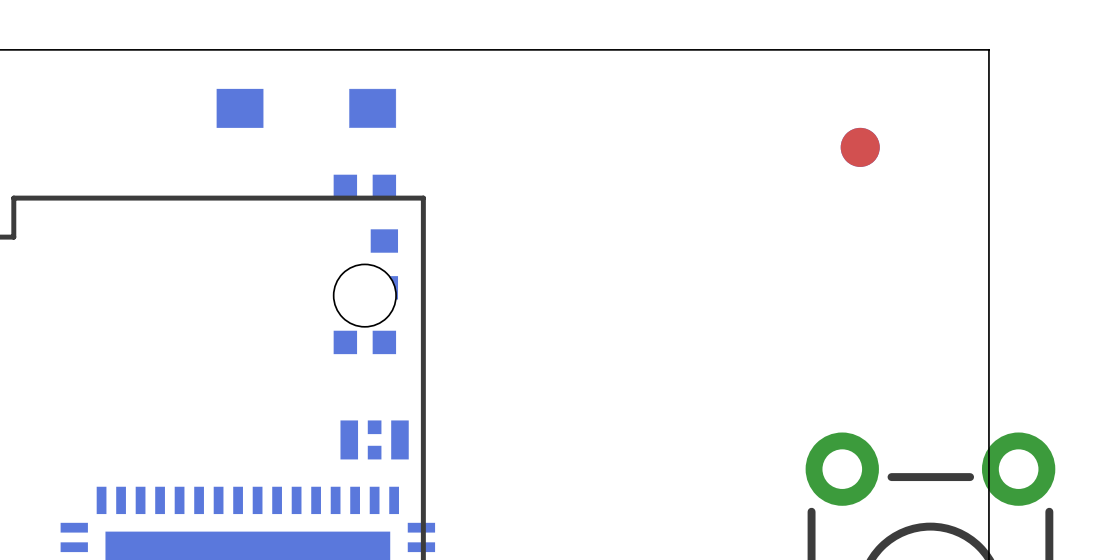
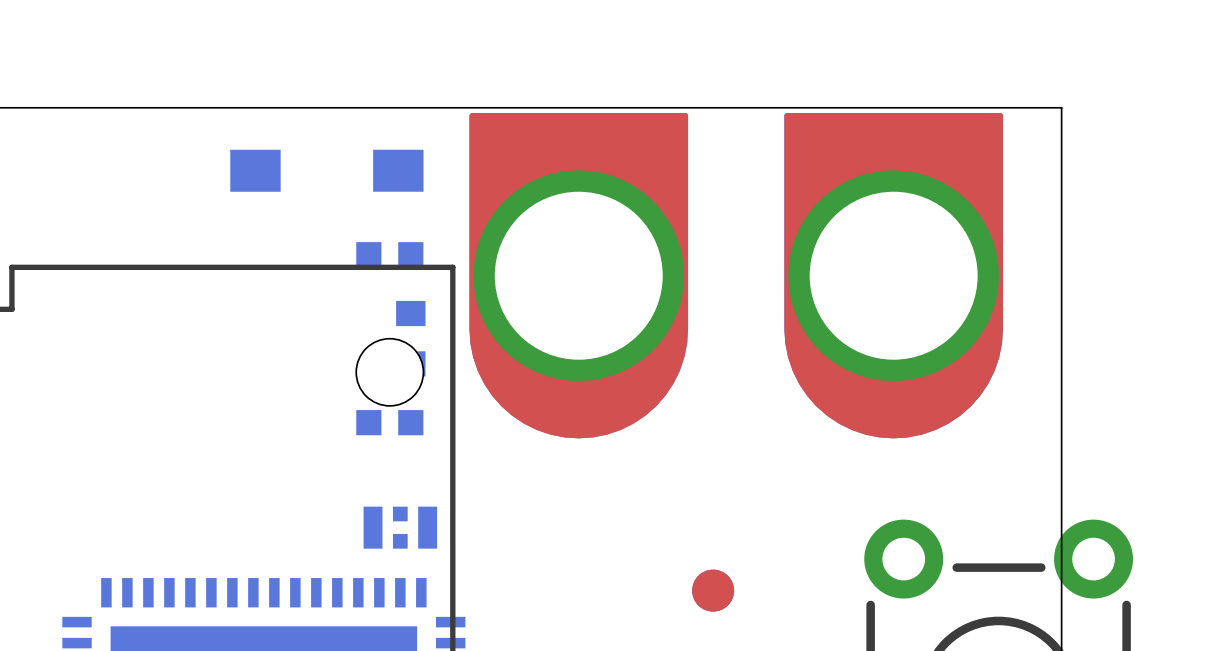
part position: (860, 147) -> (713, 590)
part: none -> (578, 275)
part: none -> (893, 275)

